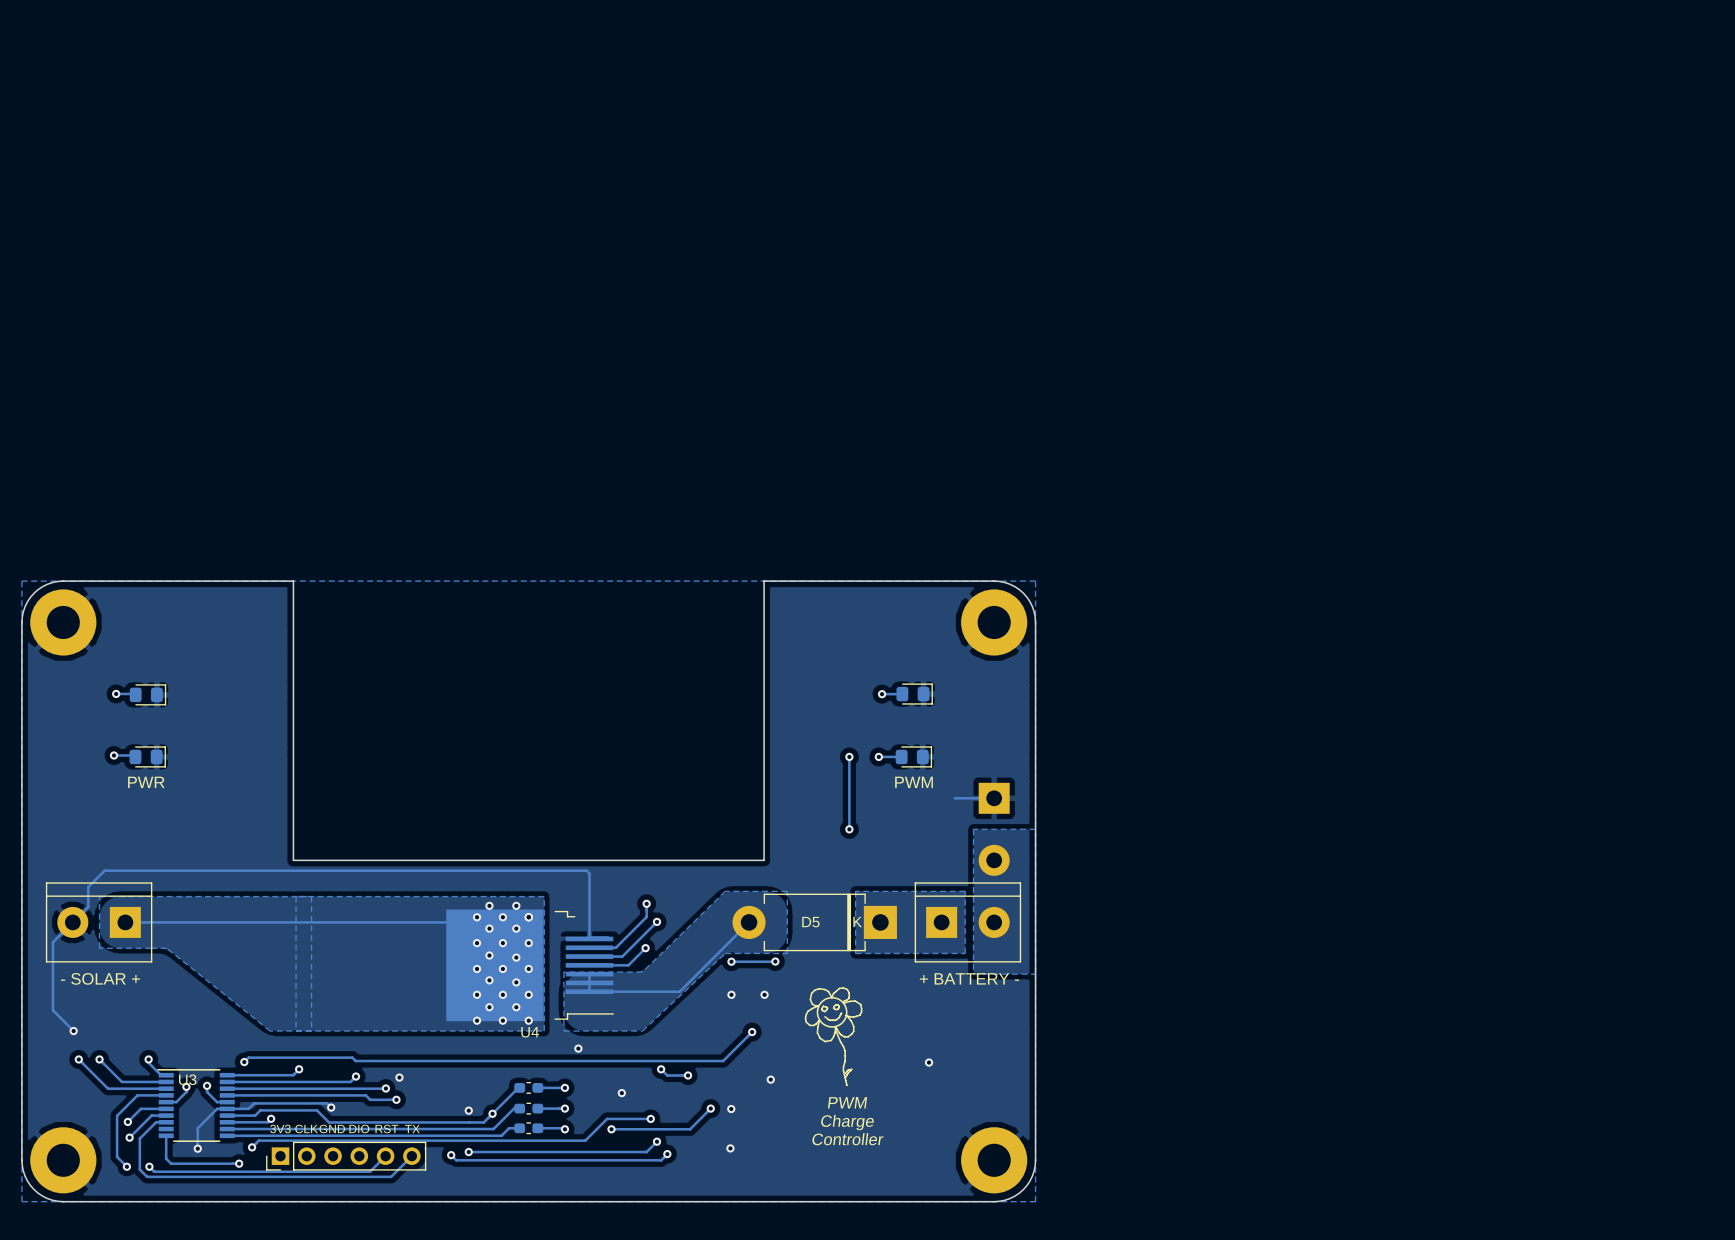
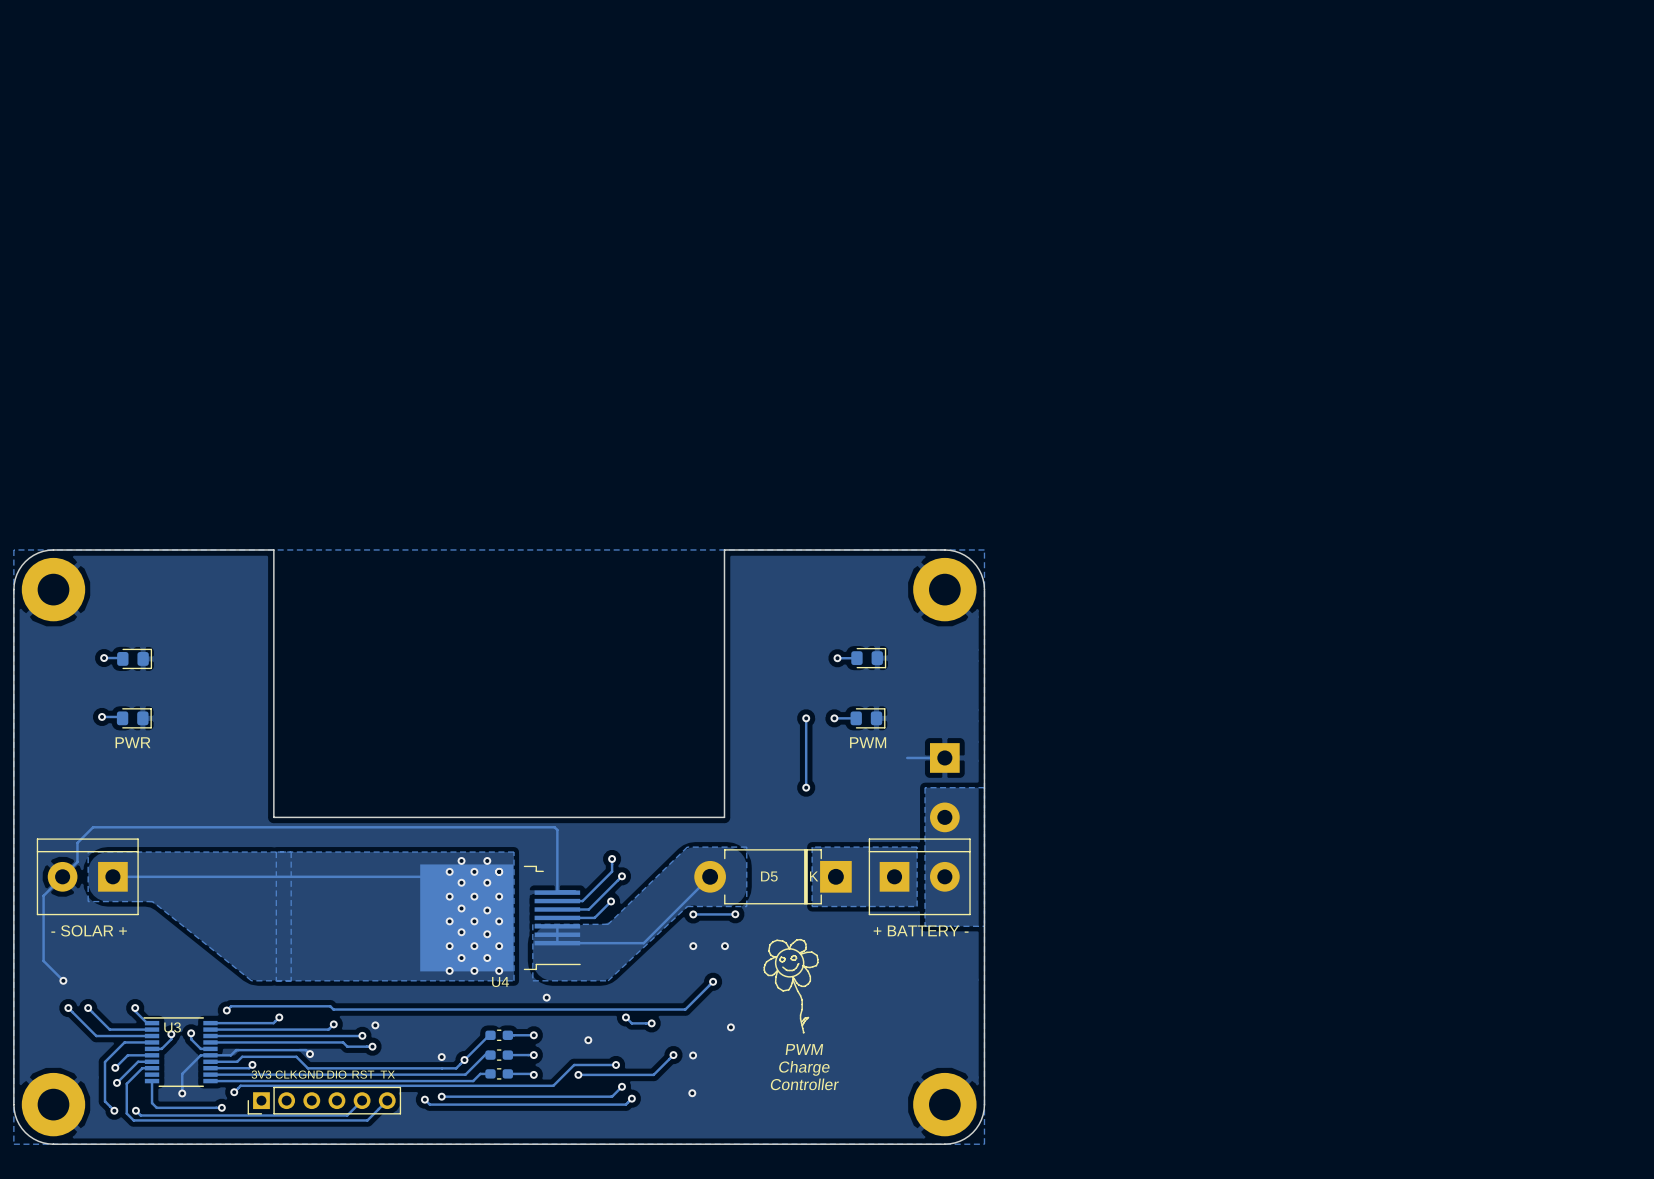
via: (929, 1062) -> none

